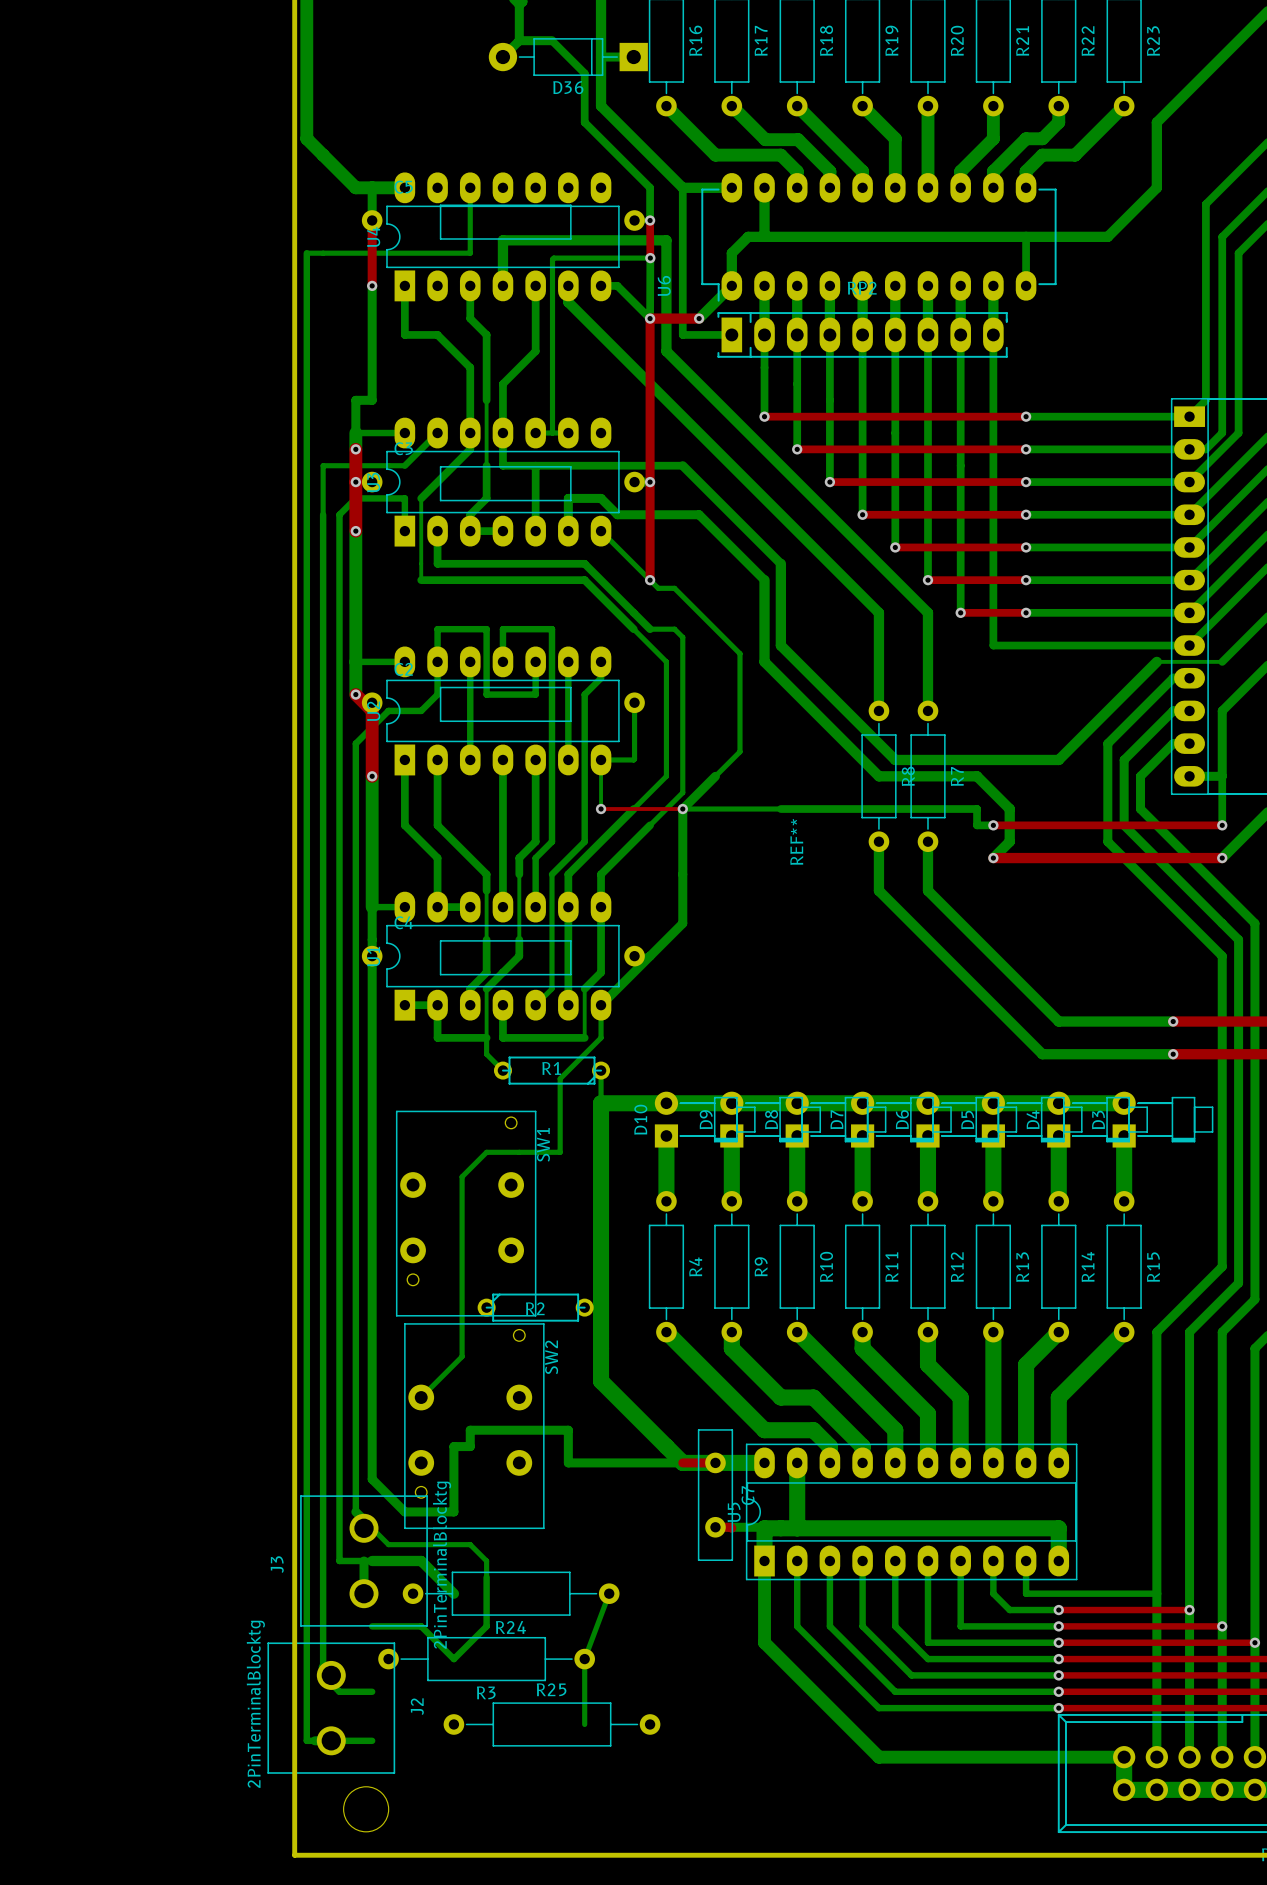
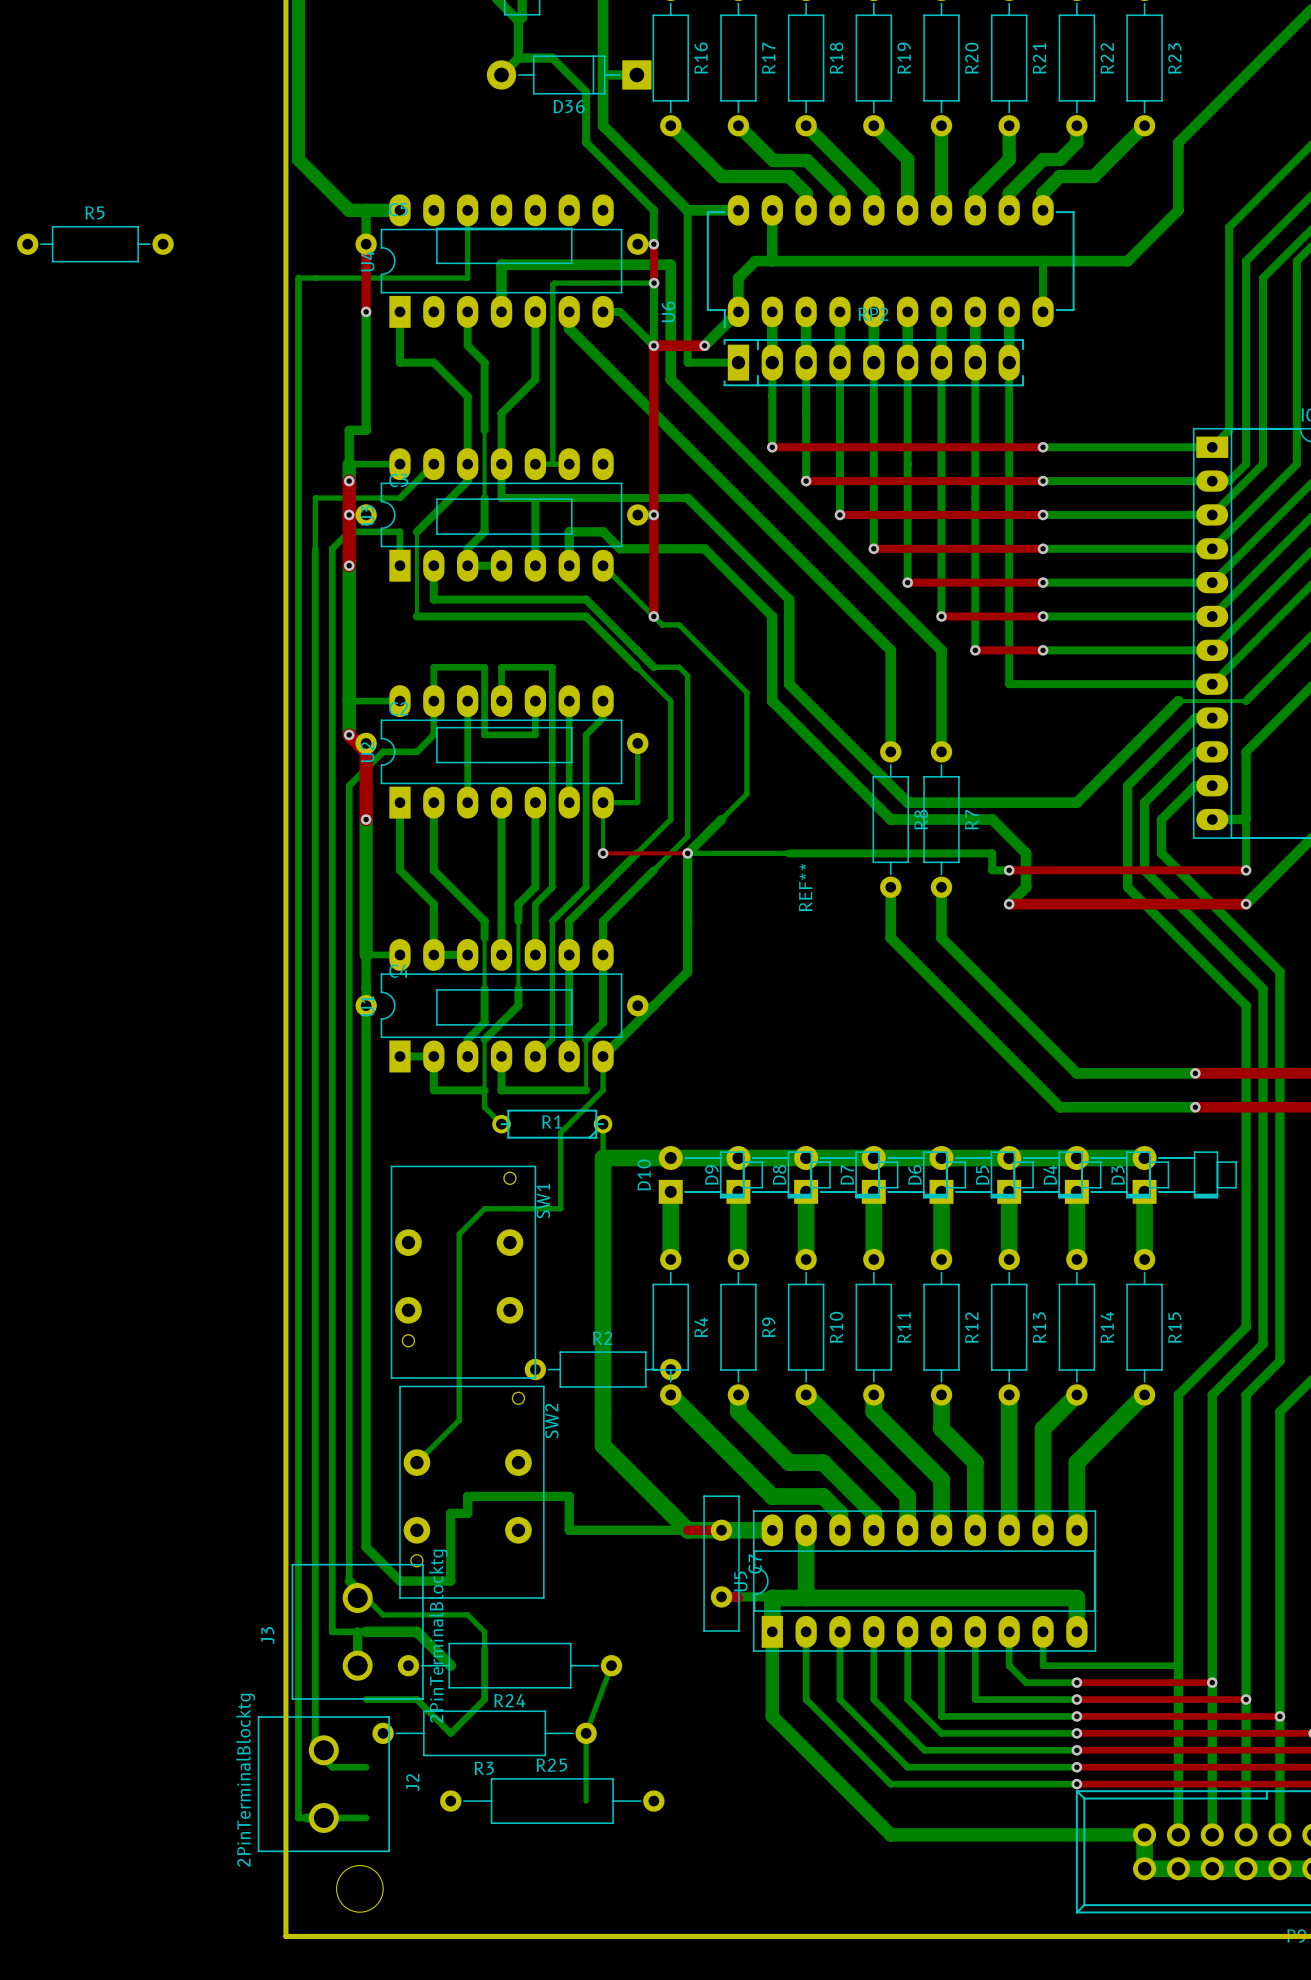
R5: none -> (95, 244)
R2 footprint: [477, 1293, 594, 1322] -> [524, 1351, 682, 1388]
R2 name position: R2 (535, 1308) -> R2 (602, 1338)

